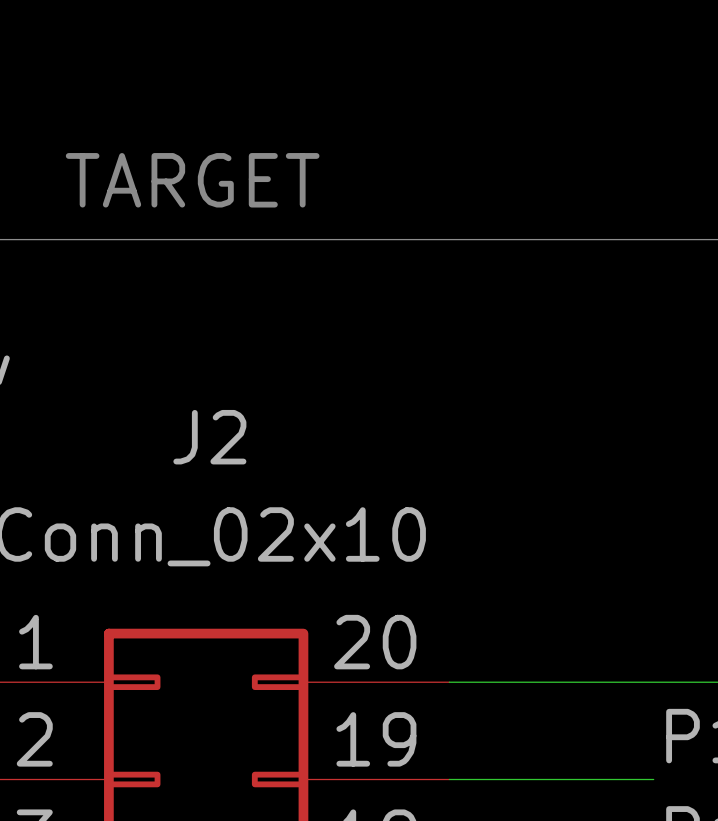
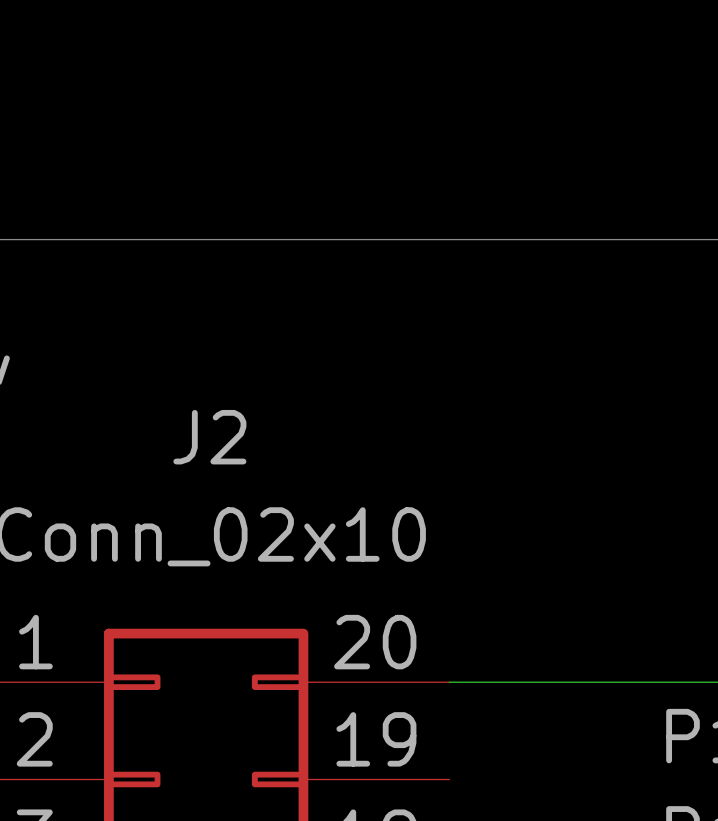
text: TARGET (192, 180) -> none
wire: (449, 779) (653, 779) -> none

